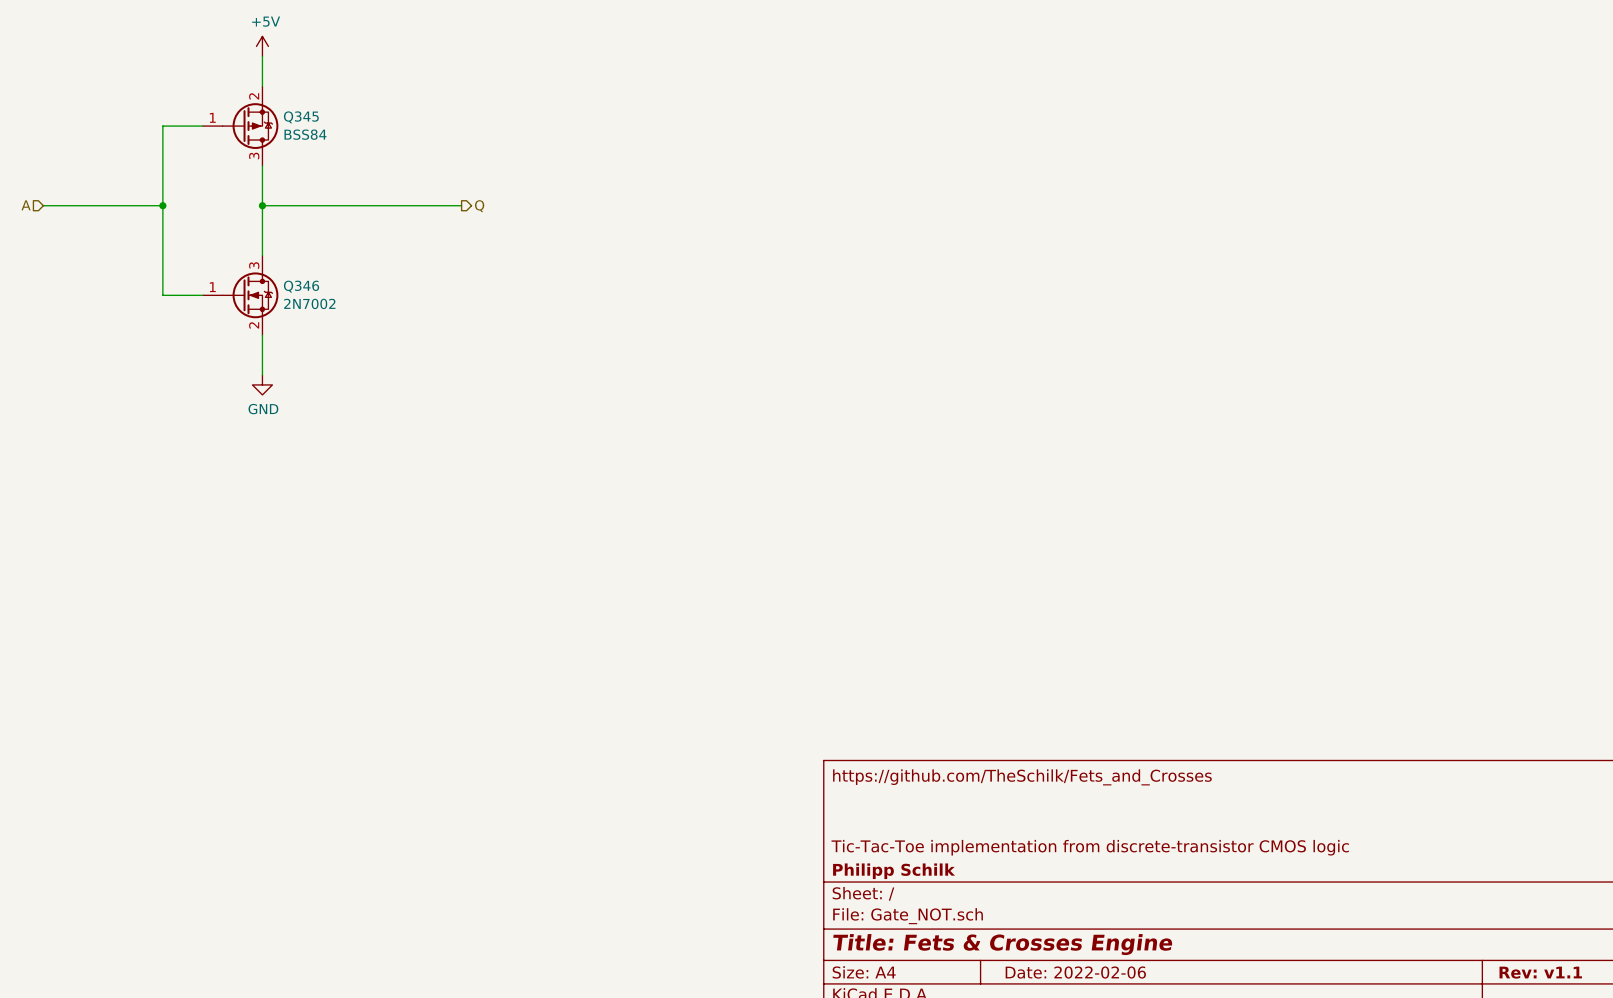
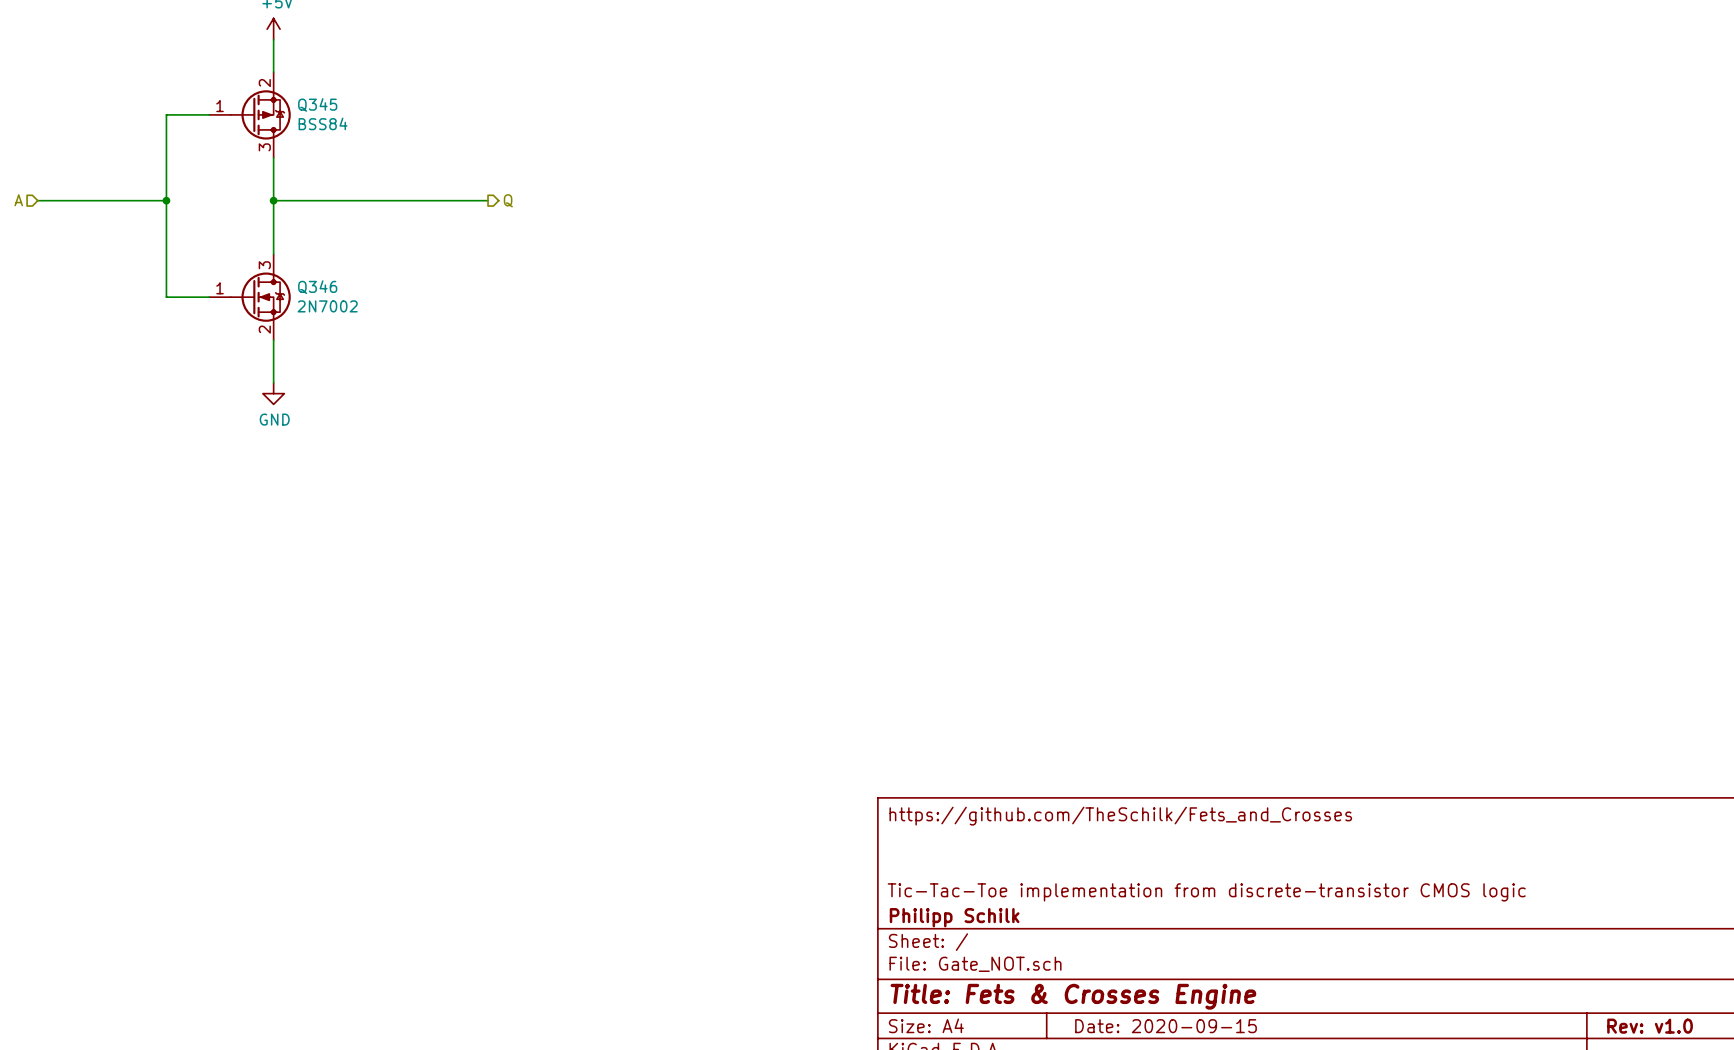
title block: Date: 2022-02-06 (1075, 972) -> Date: 2020-09-15 (1166, 1026)
title block: Rev: v1.1 (1540, 972) -> Rev: v1.0 (1650, 1026)

